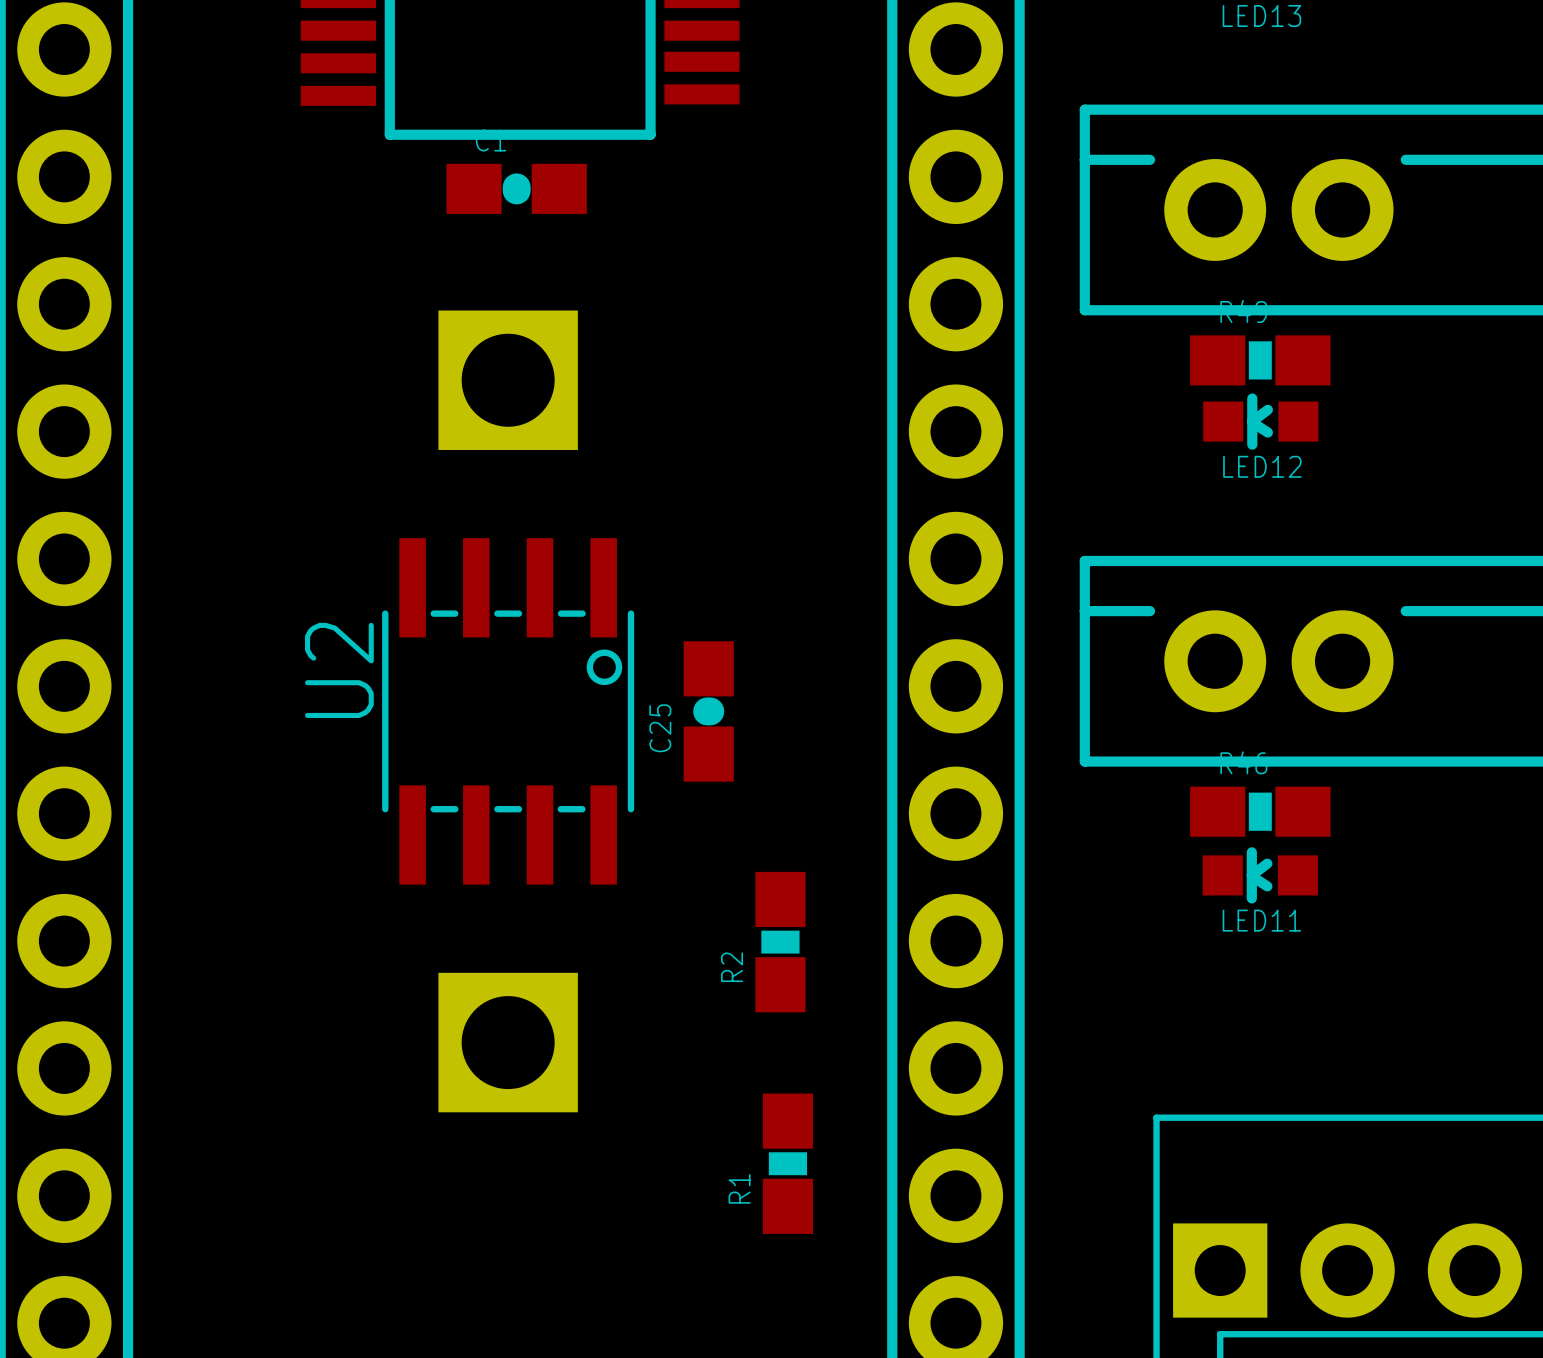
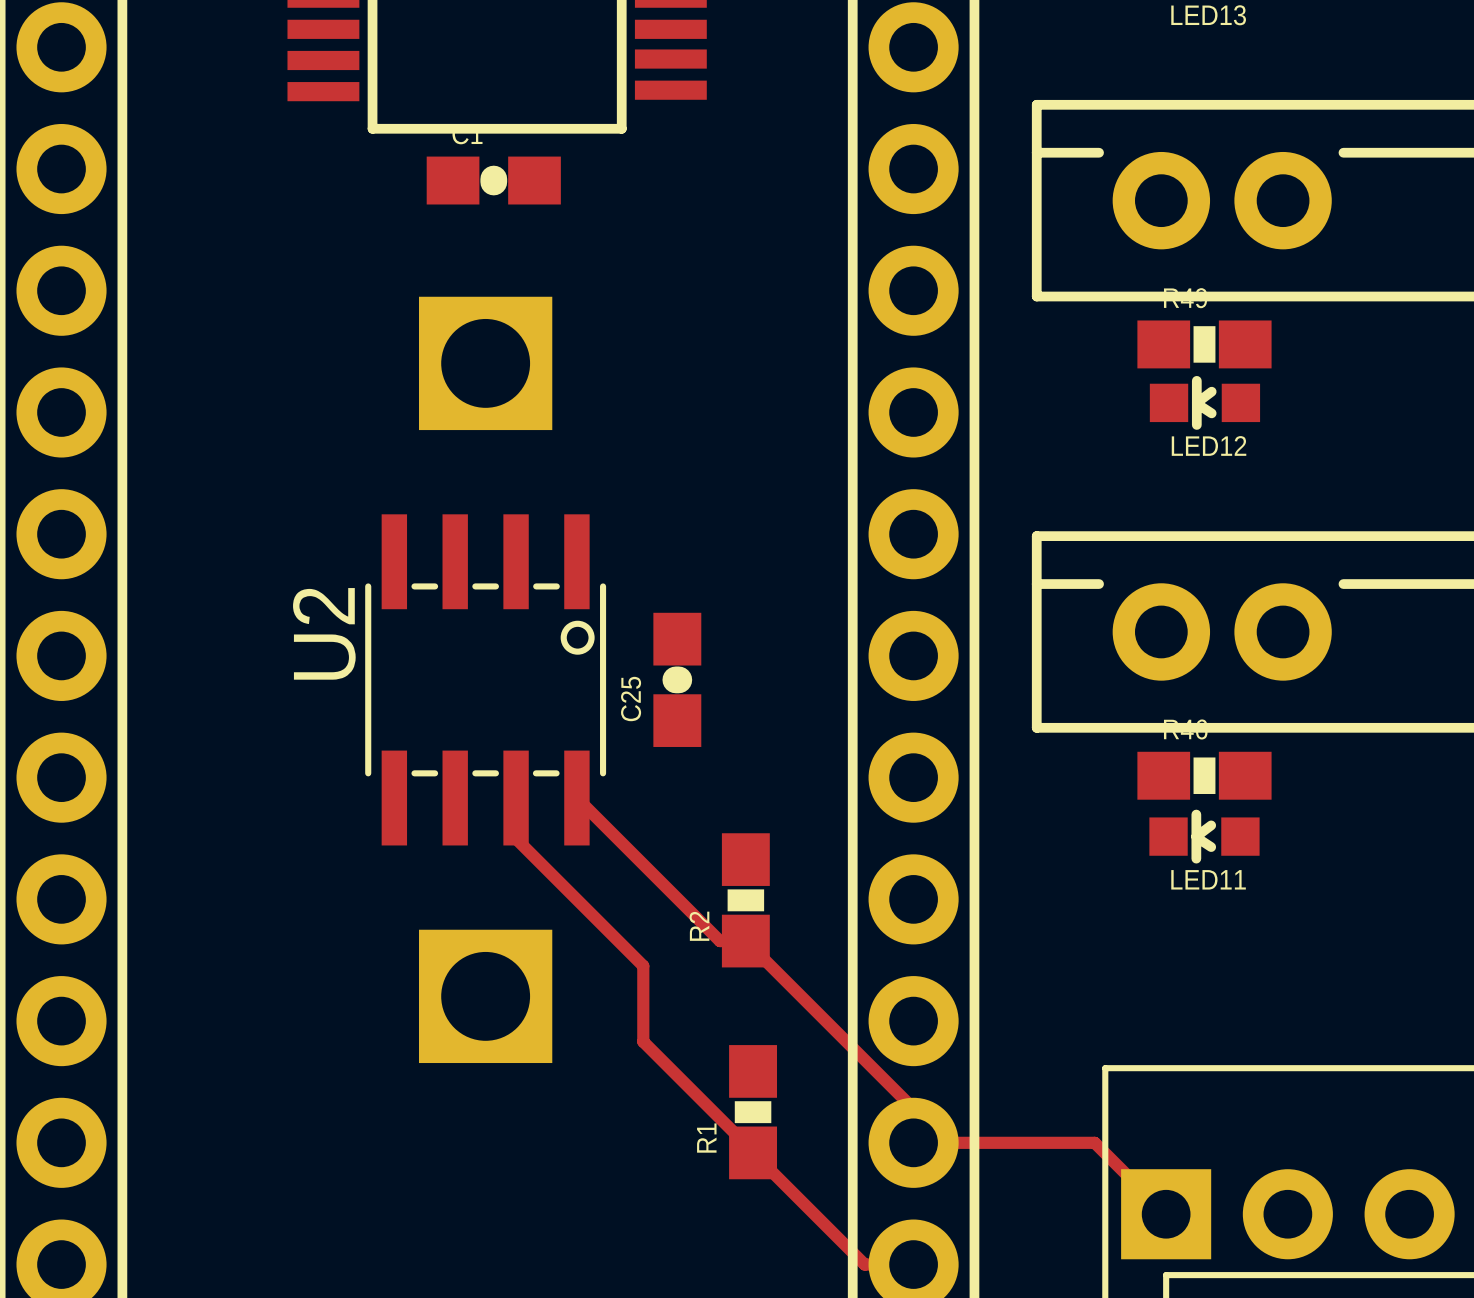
track: none -> (516, 798) (516, 838) (643, 965) (643, 1041) (864, 1264) (913, 1264)
track: none -> (576, 798) (719, 941) (745, 941) (913, 1108) (913, 1142) (1094, 1142) (1166, 1214)

